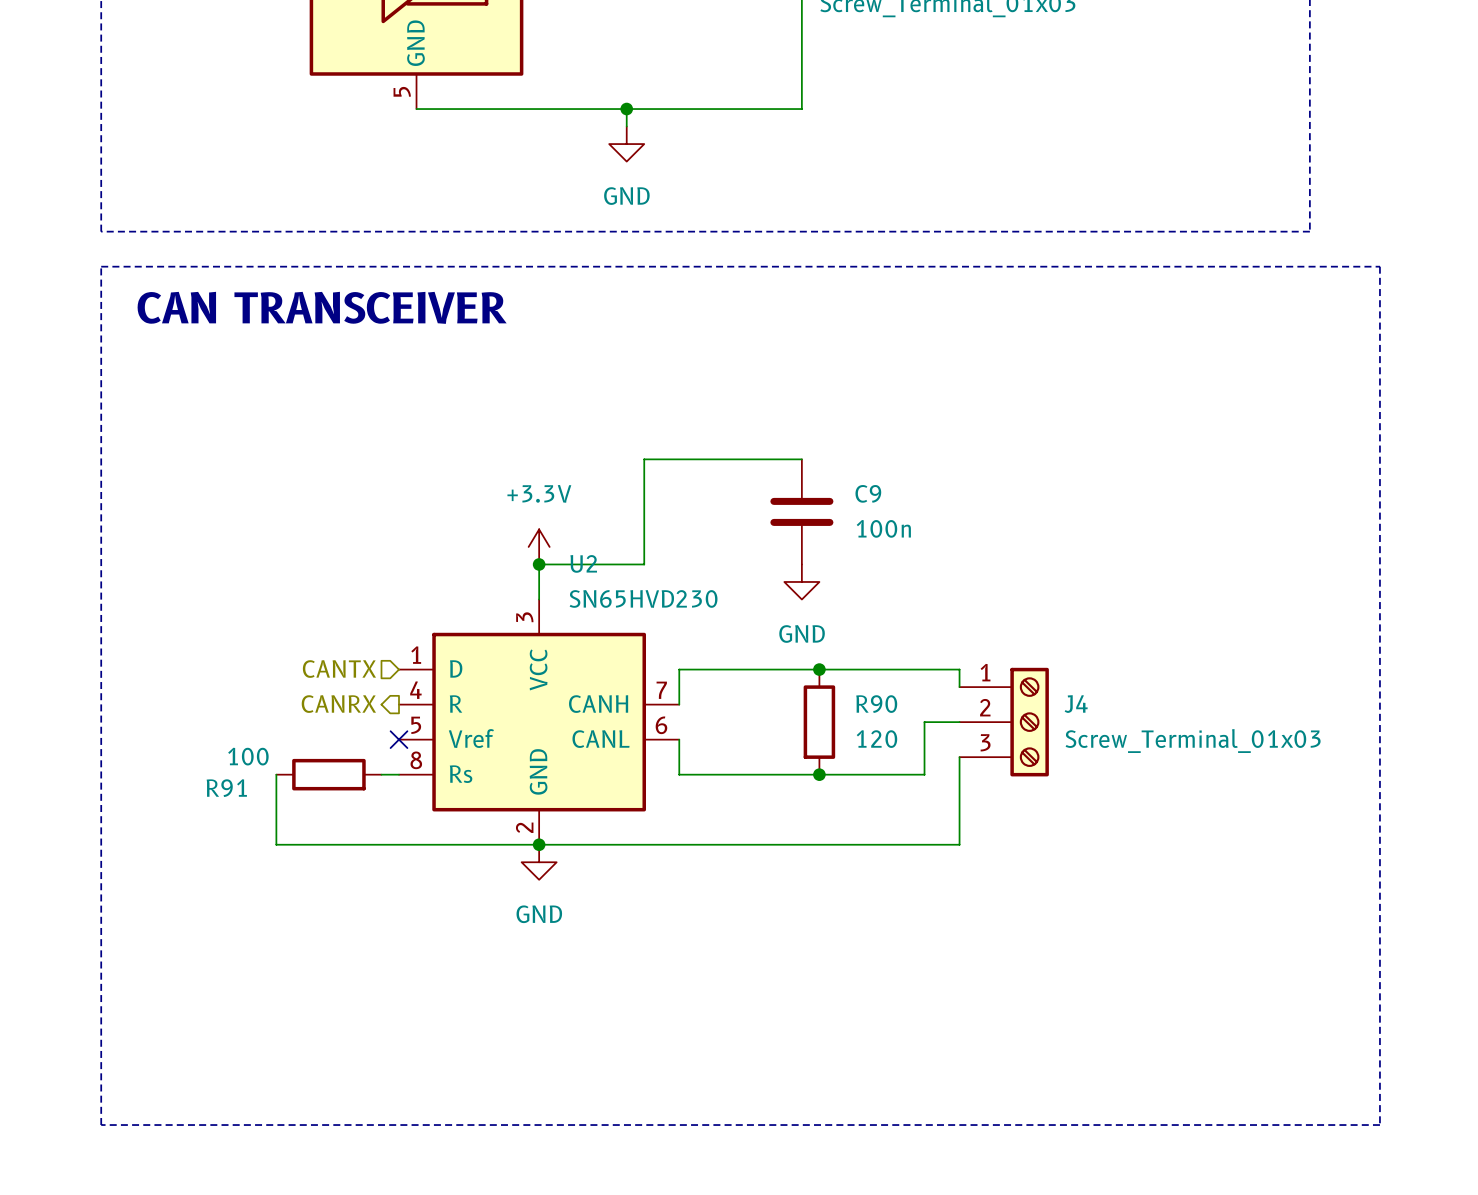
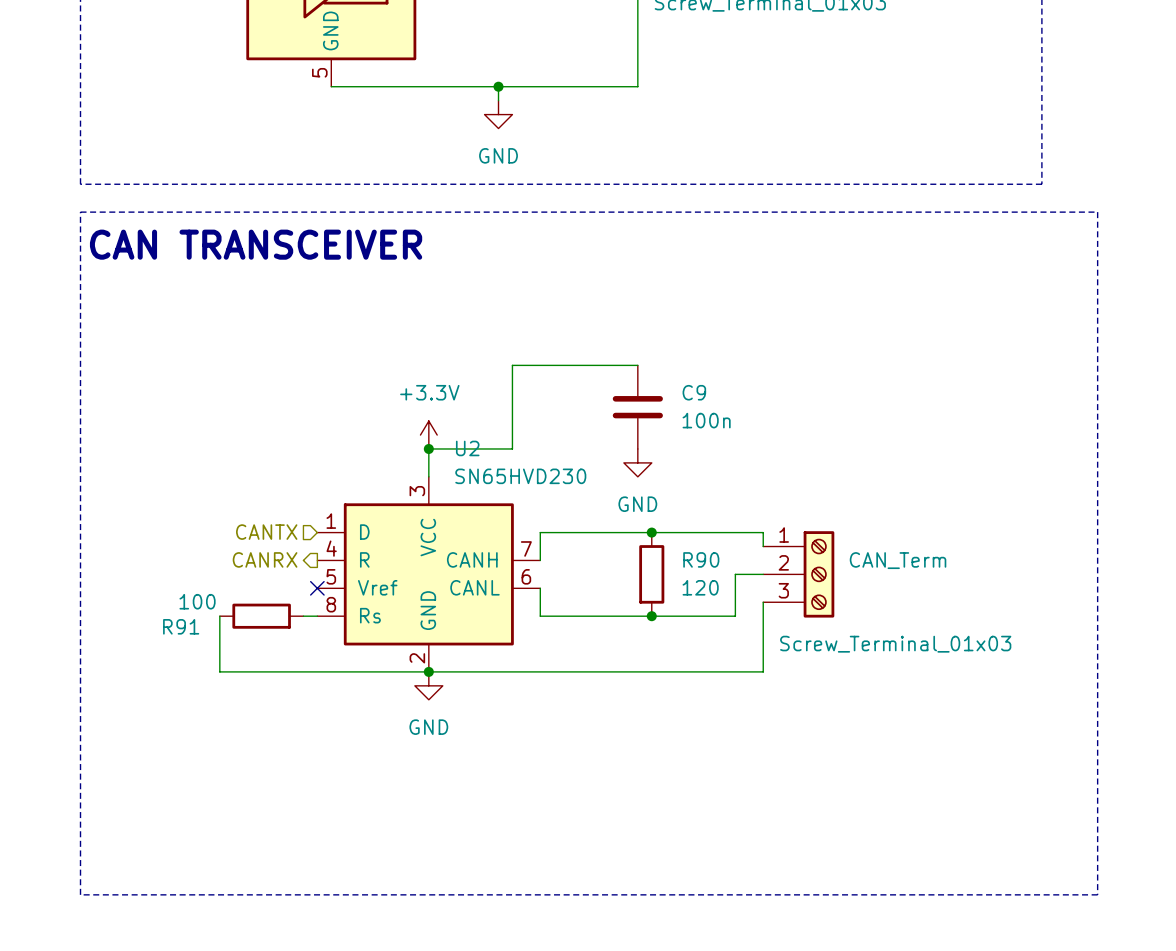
J4 name: J4 (1076, 704) -> CAN_Term (898, 560)
J4 value position: Screw_Terminal_01x03 (1193, 741) -> Screw_Terminal_01x03 (895, 644)

